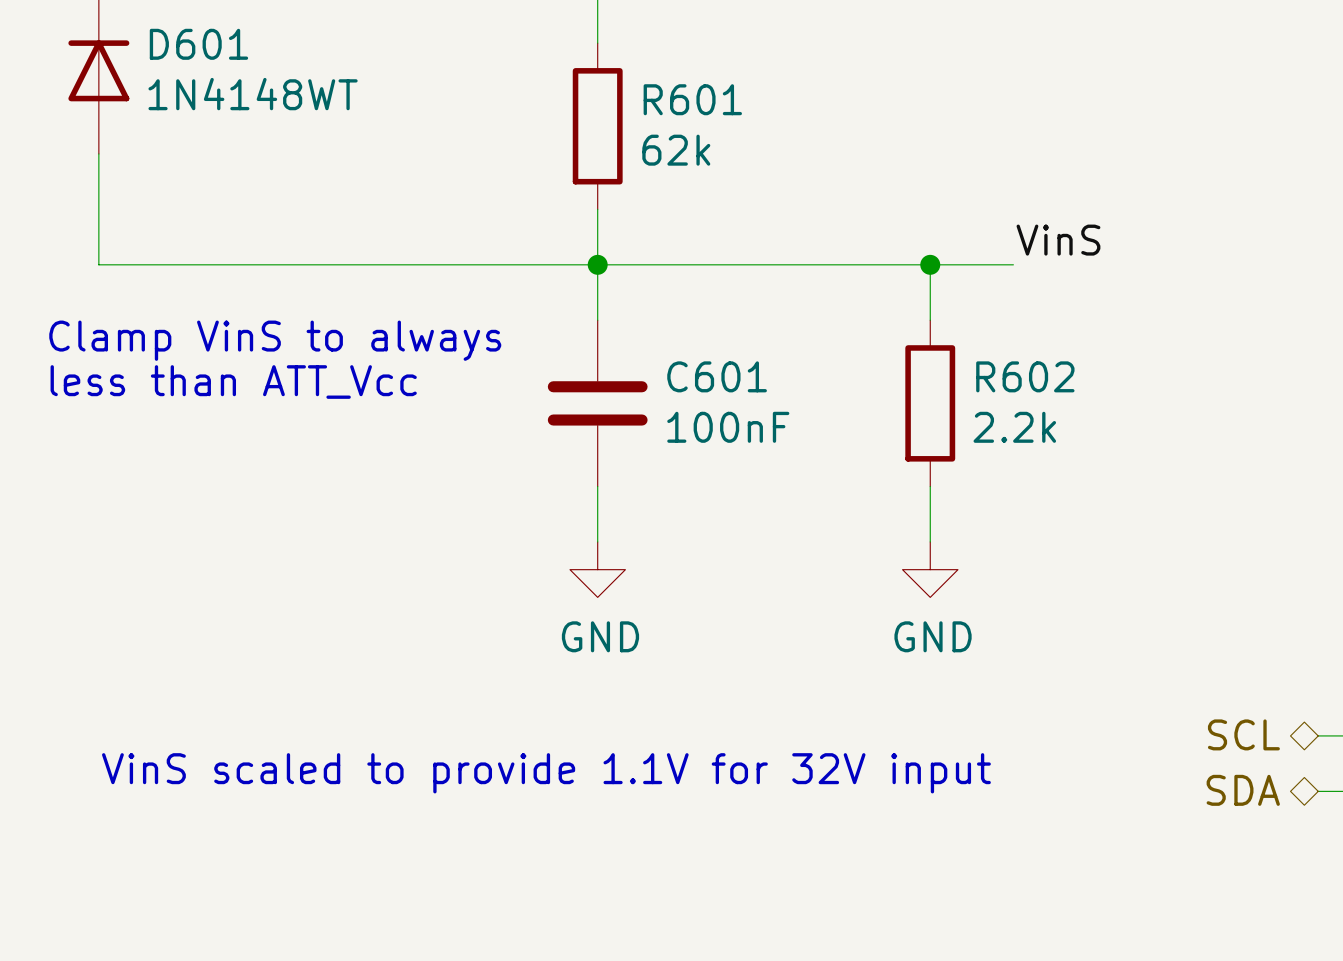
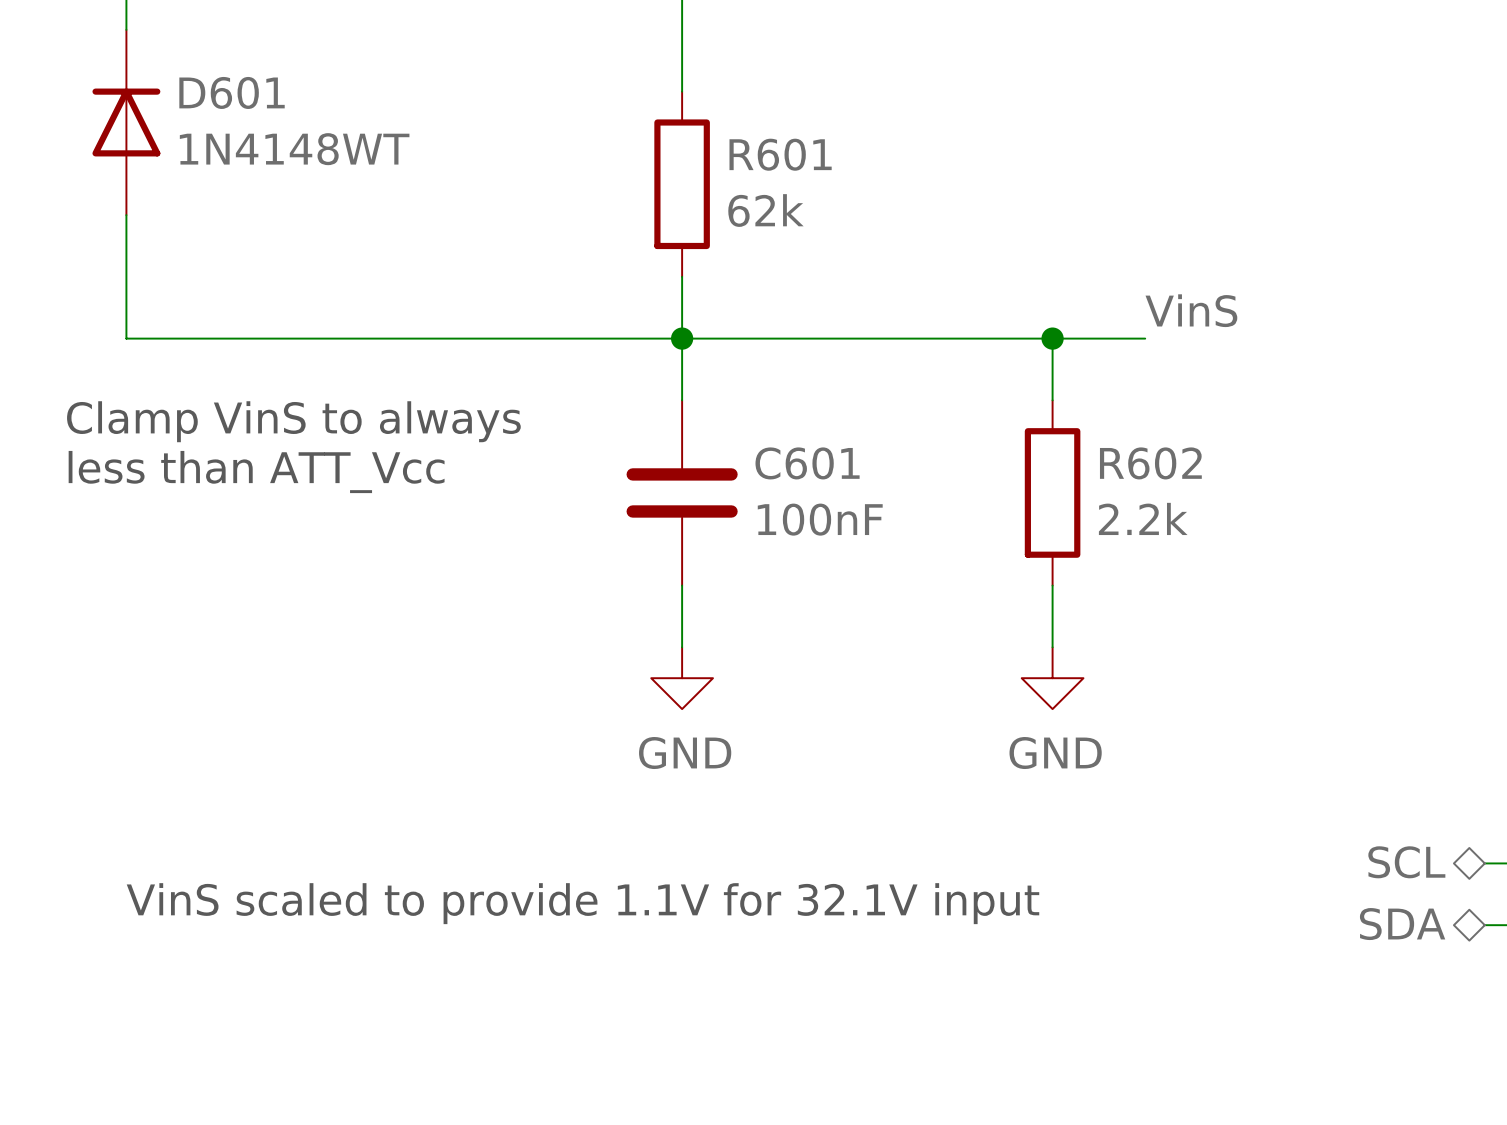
text: VinS scaled to provide 1.1V for 32V input (546, 773) -> VinS scaled to provide 1.1V for 32.1V input (582, 903)

